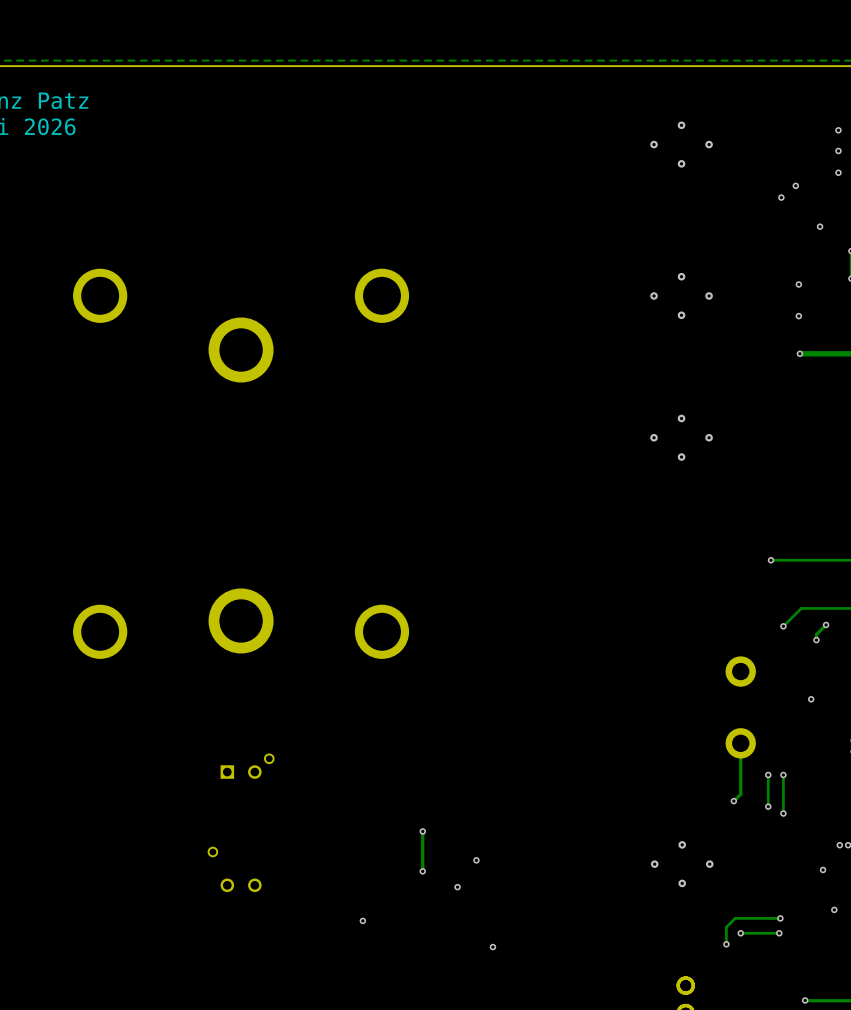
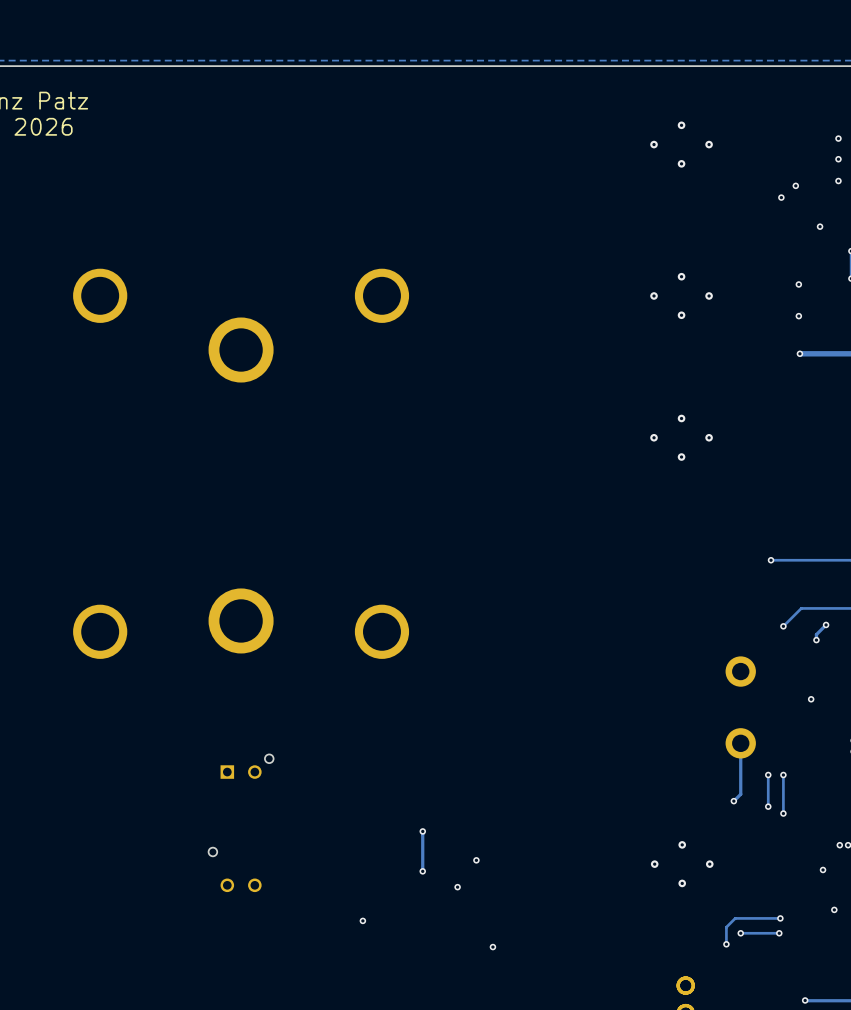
via: (838, 130) -> none
via: none -> (838, 138)
via: (838, 150) -> none
via: none -> (838, 159)
via: (838, 172) -> none
via: none -> (838, 181)

